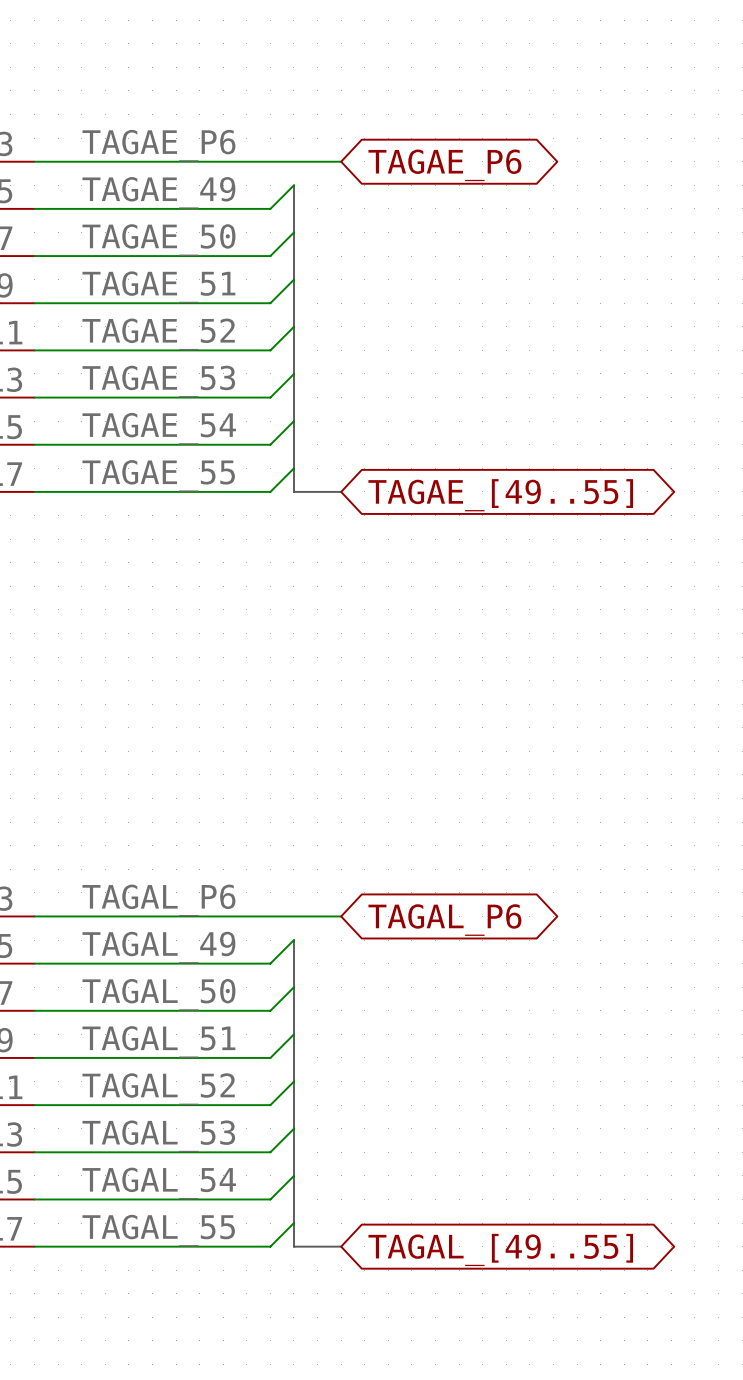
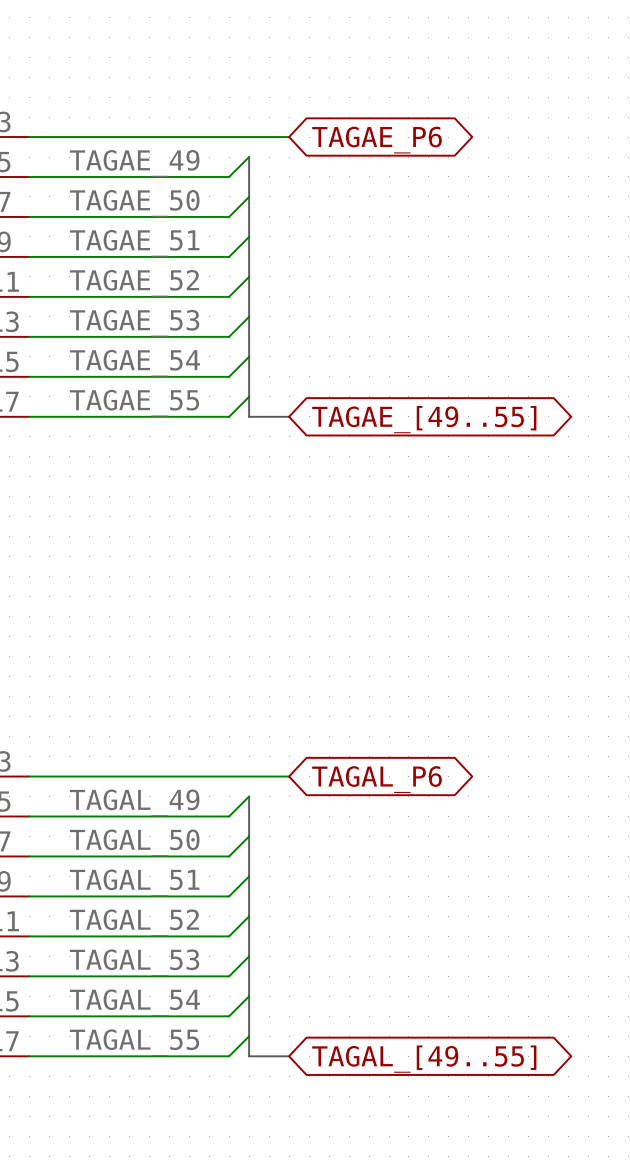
label: TAGAE_P6 (158, 145) -> none
label: TAGAL_P6 (158, 900) -> none

